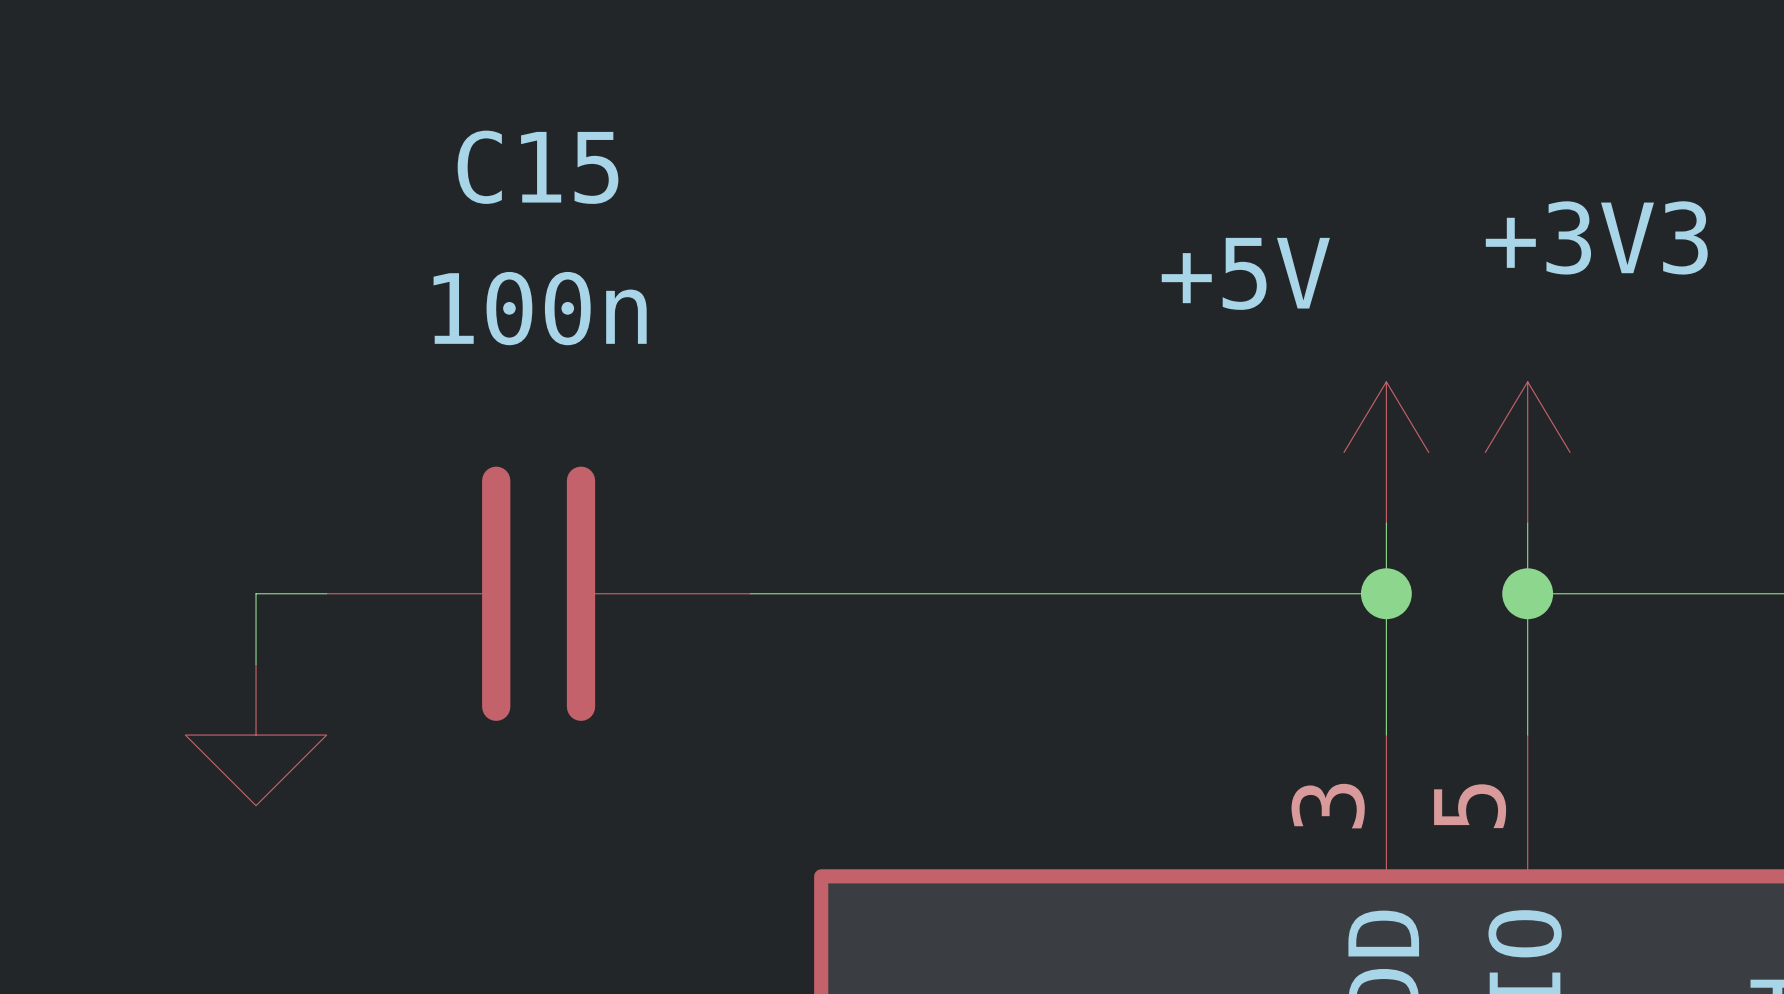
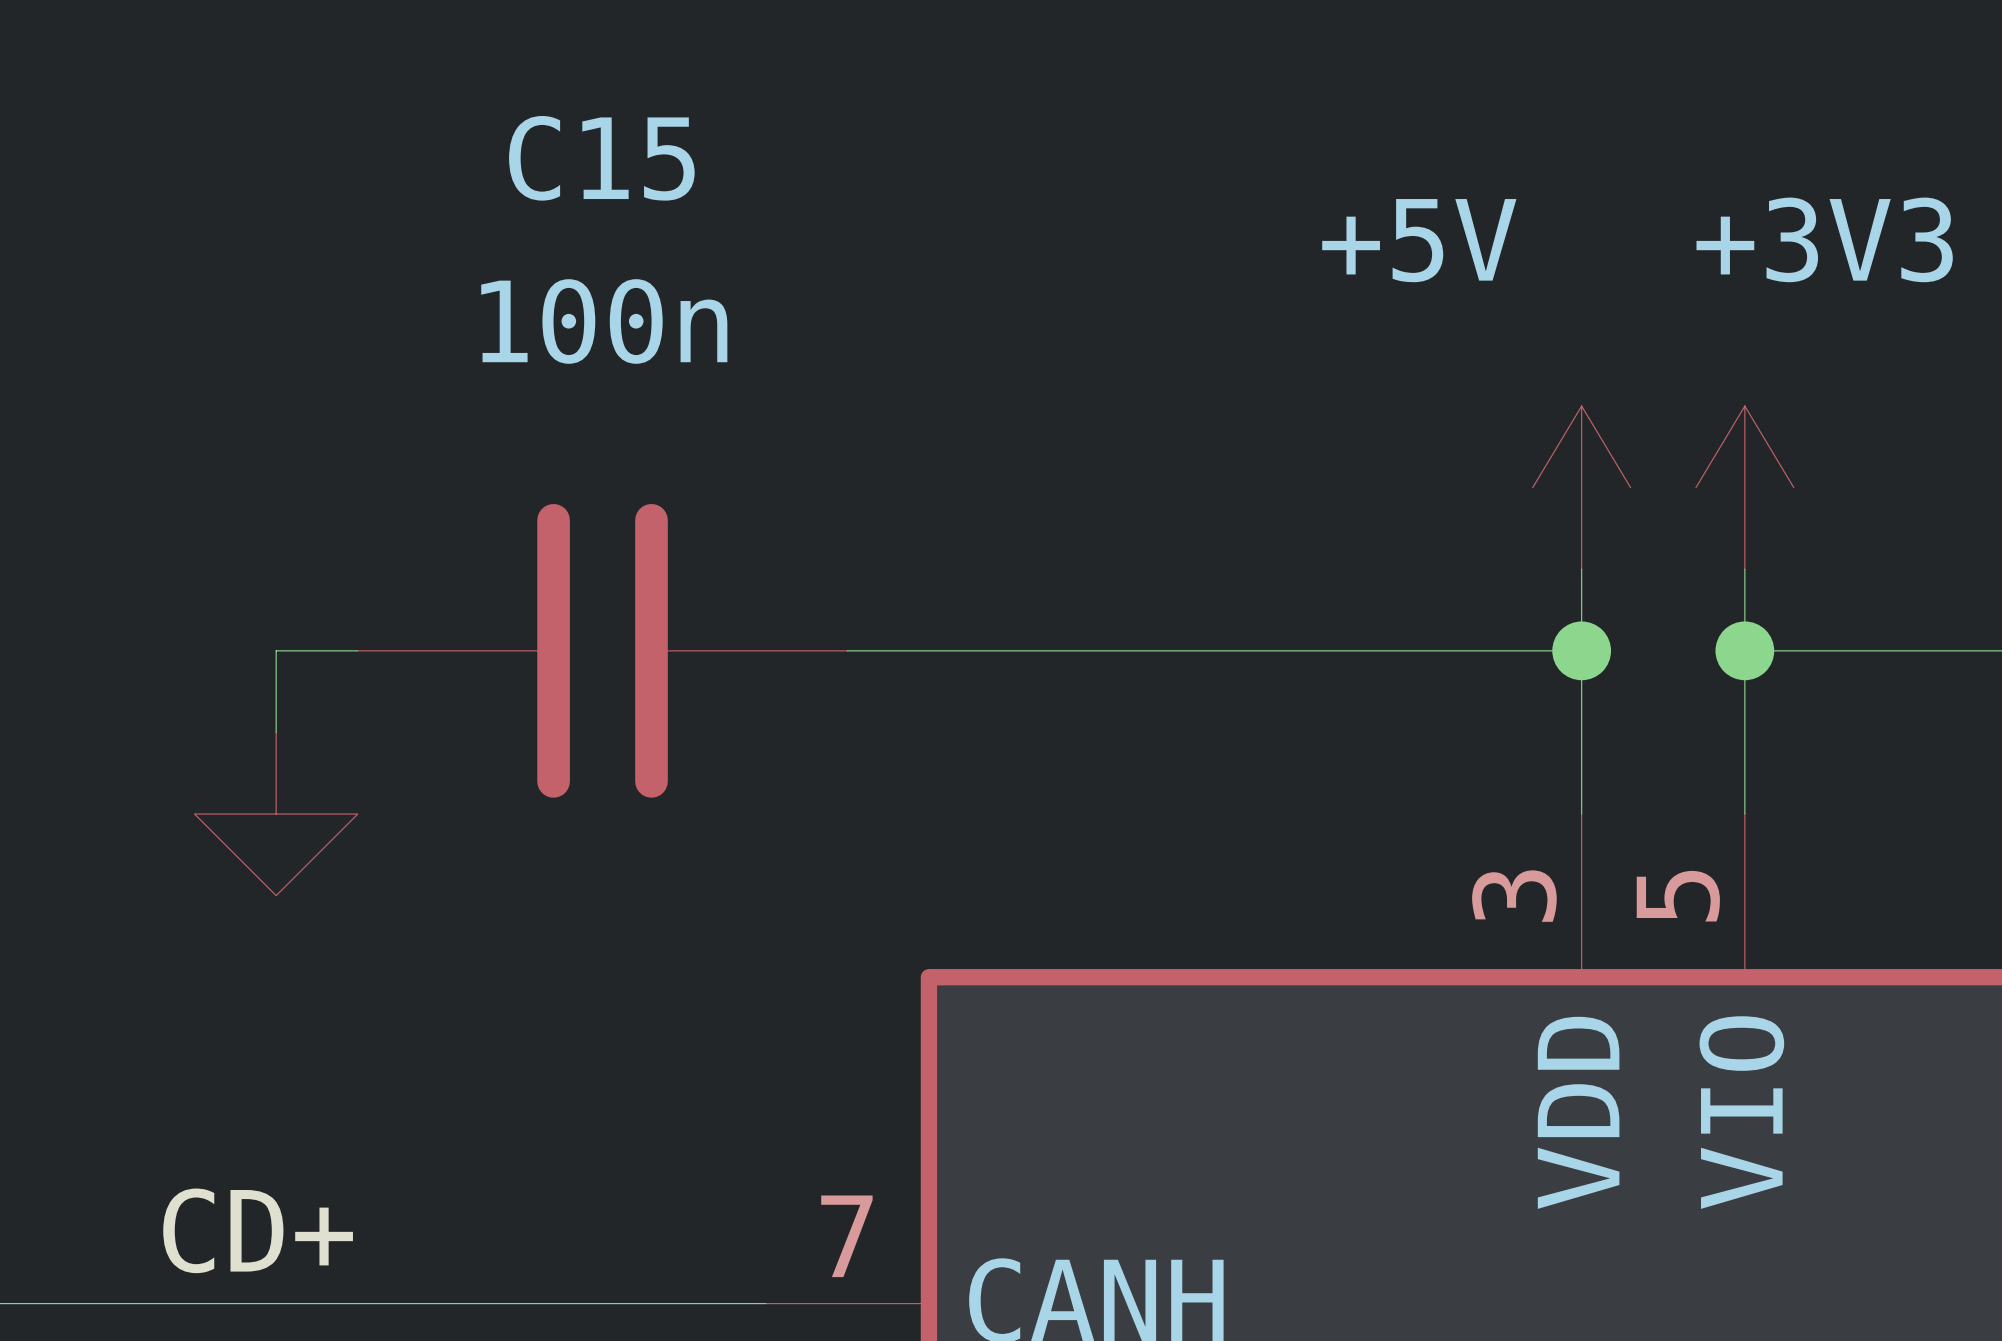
power symbol text position: +5V (1245, 273) -> +5V (1419, 240)

